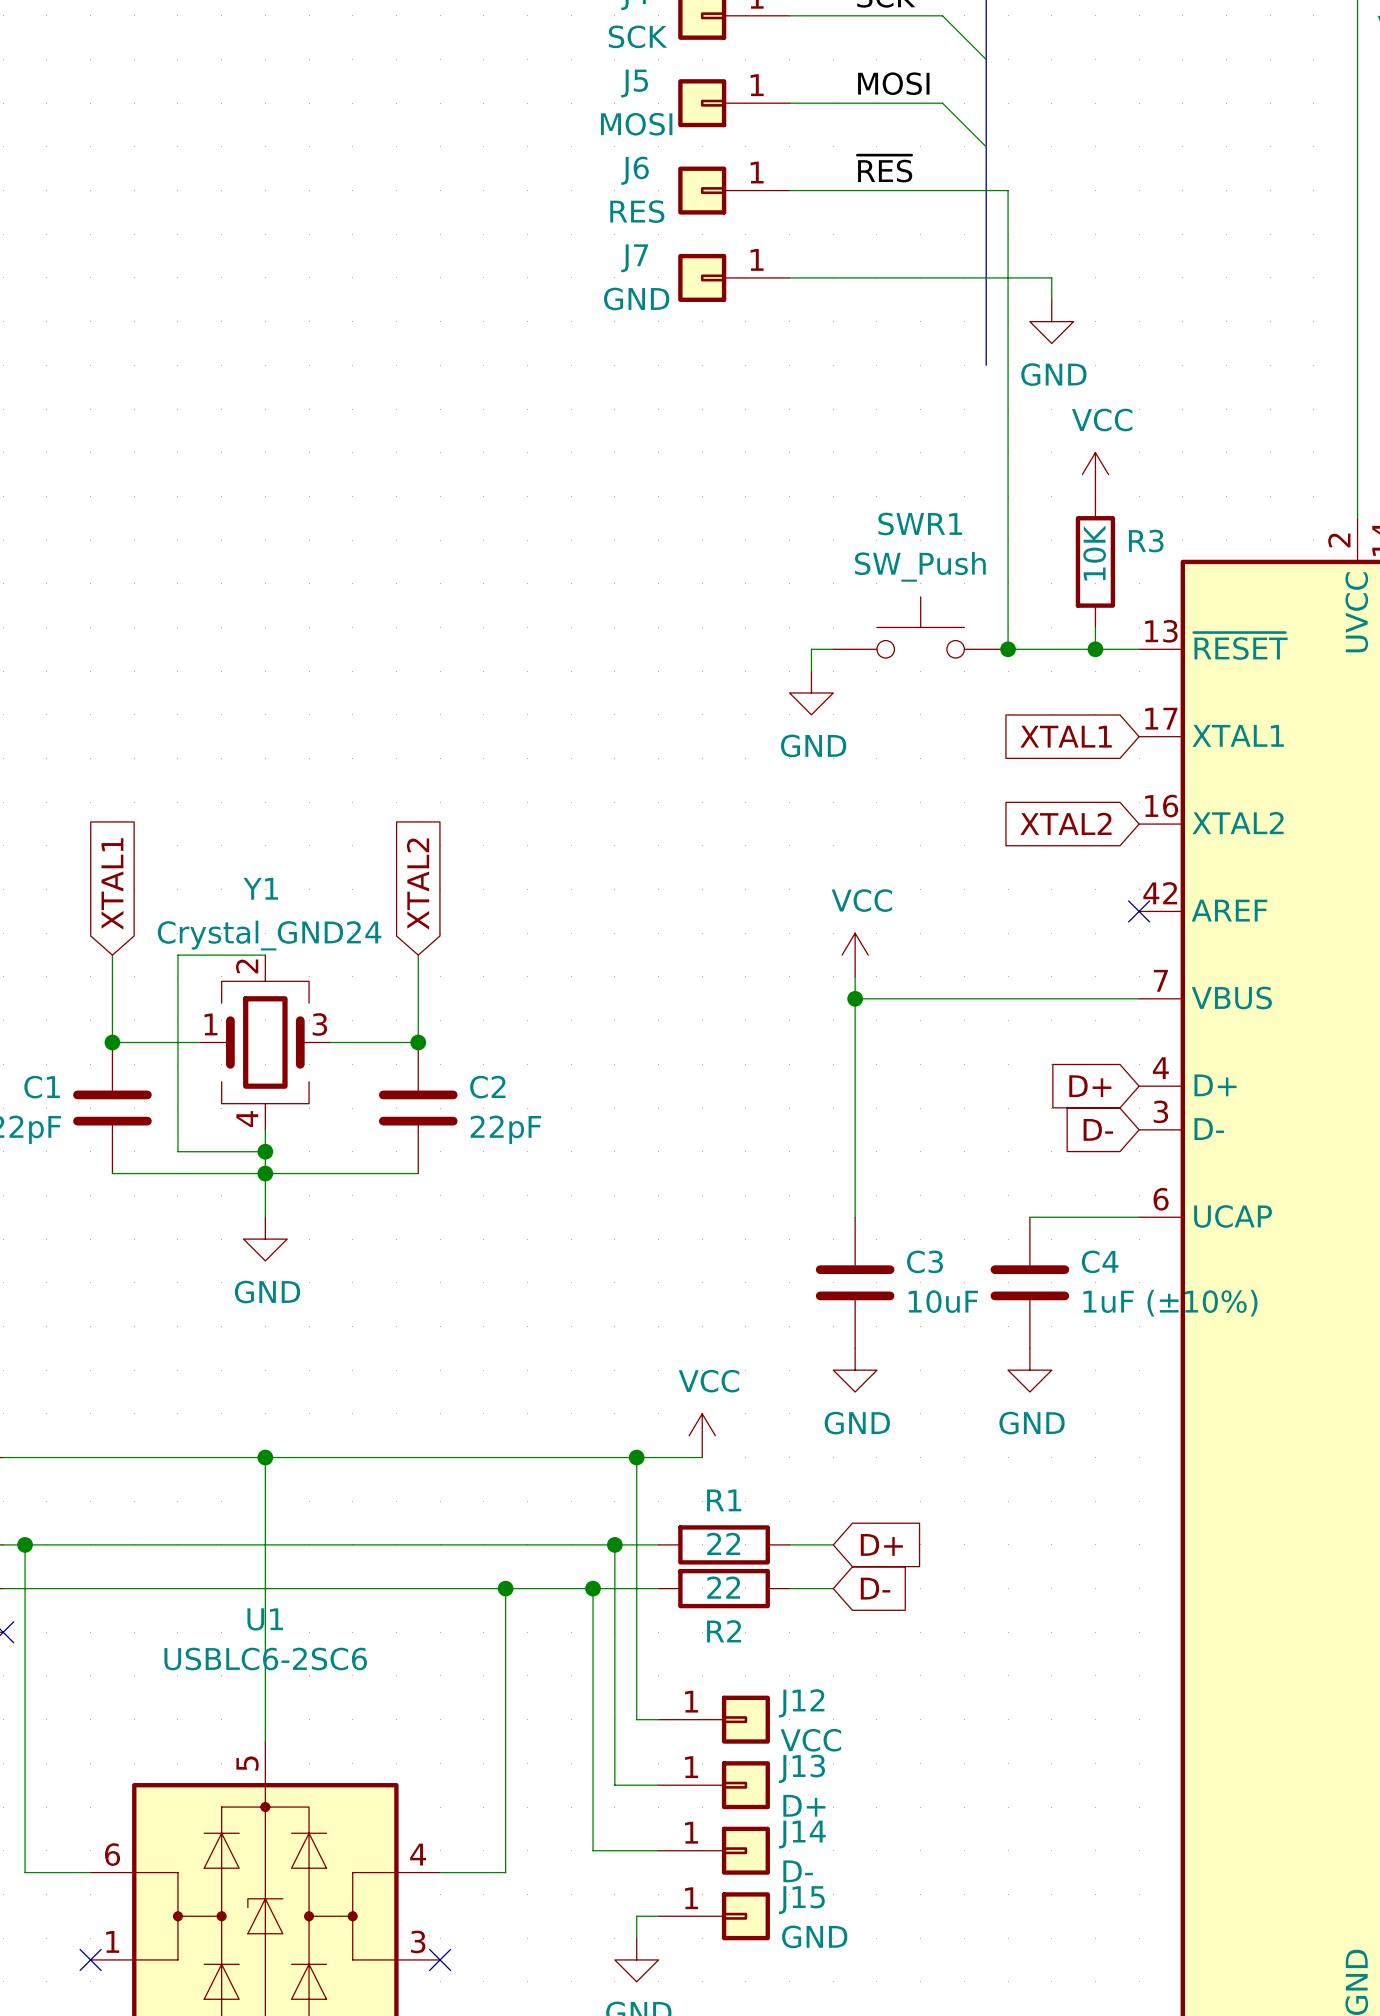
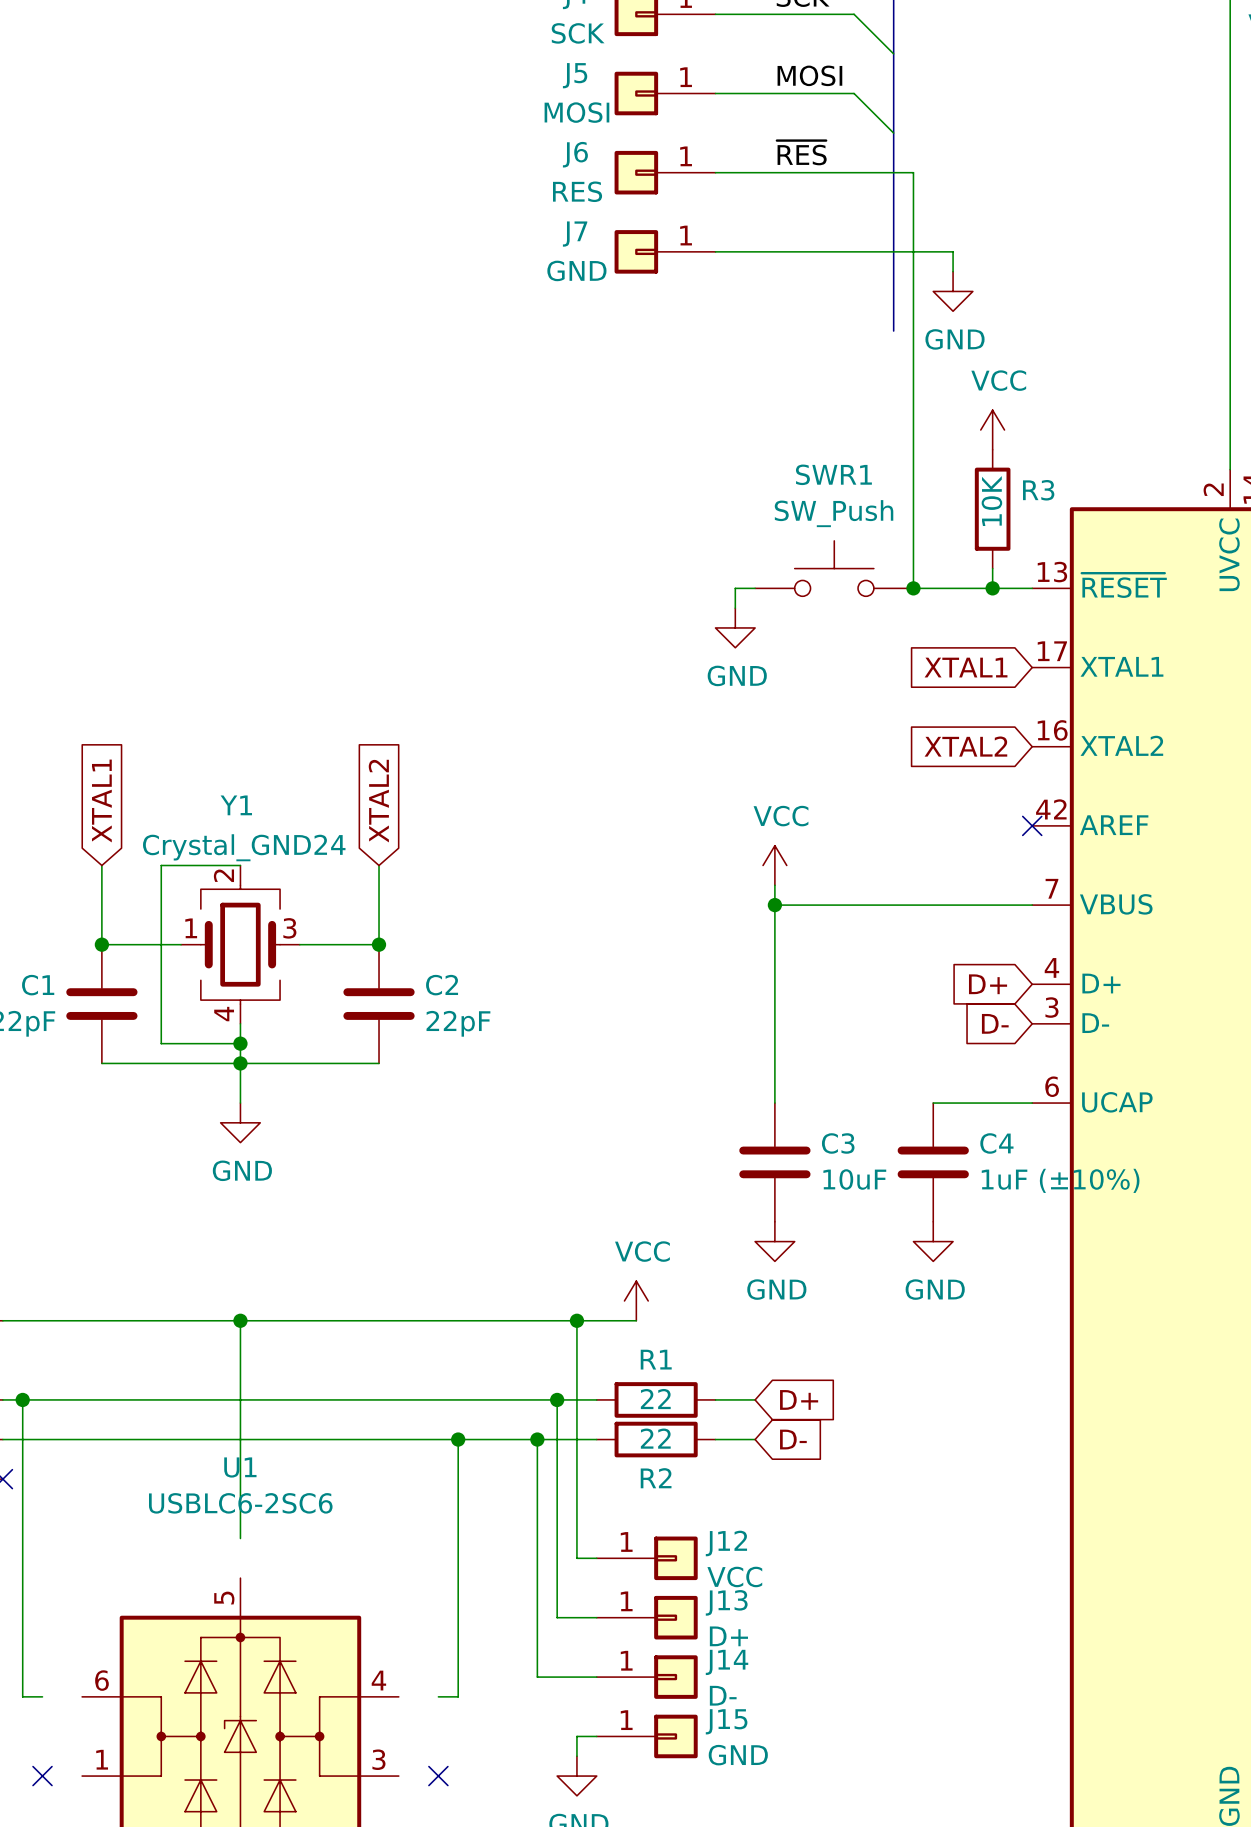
wire: (265, 1697) (265, 1741) -> none
wire: (46, 1872) (90, 1872) -> none
wire: (440, 1872) (483, 1872) -> none
no-connect mark position: (90, 1959) -> (42, 1776)
no-connect mark position: (440, 1959) -> (438, 1776)

